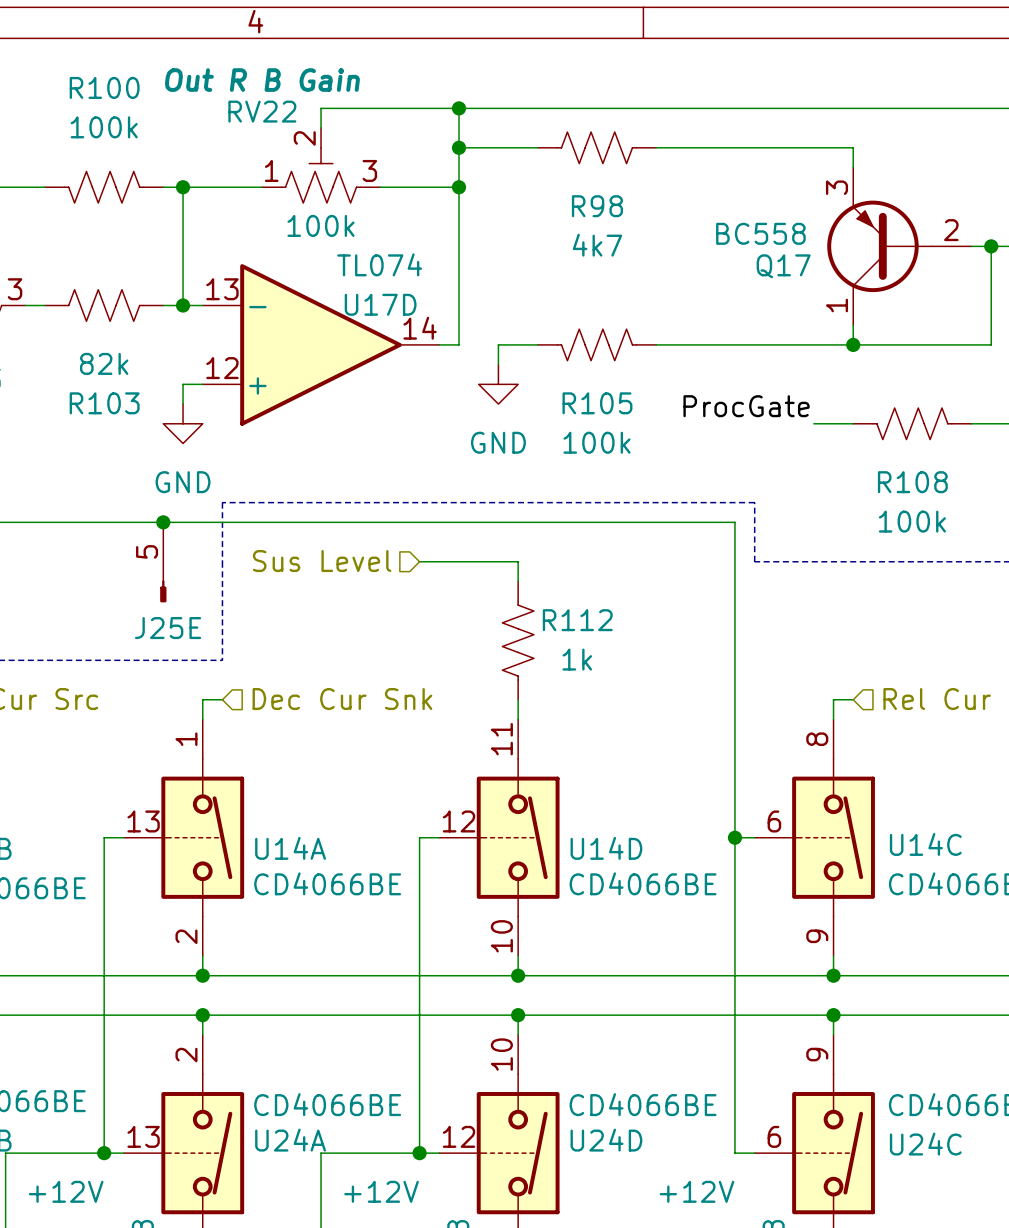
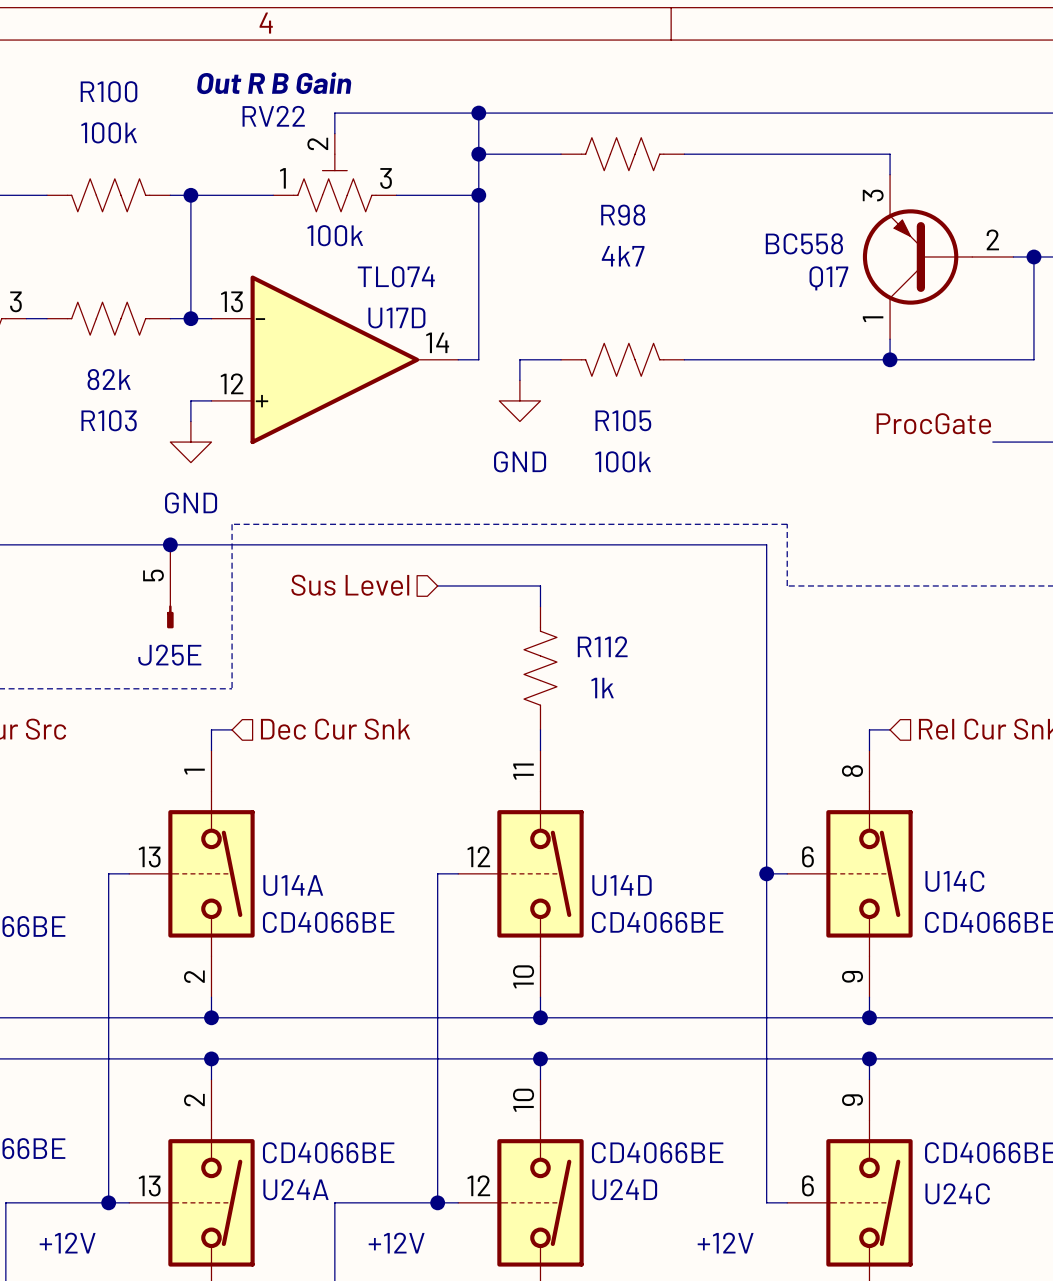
label position: ProcGate (746, 406) -> ProcGate (933, 423)
wire: (813, 423) (853, 423) -> none
R108: 100k (912, 423) -> none

